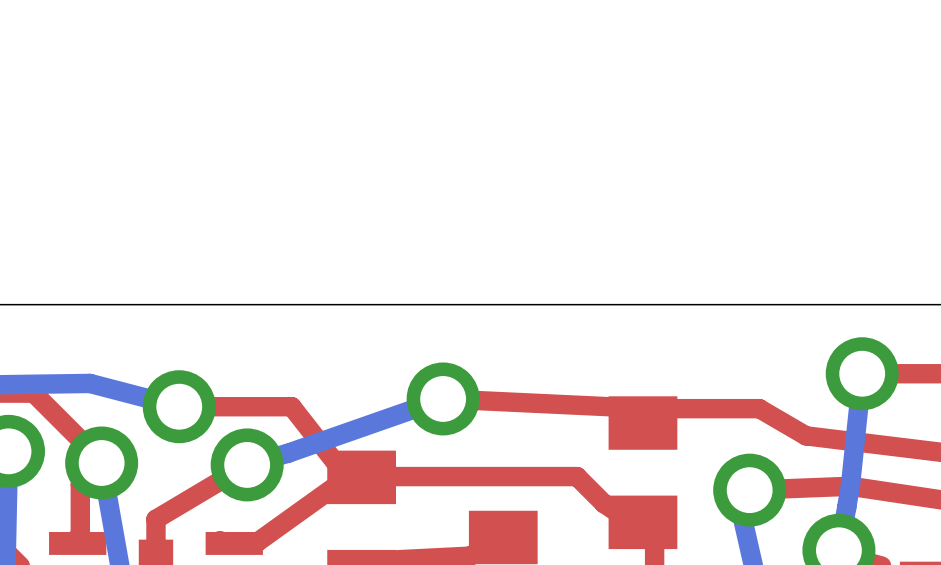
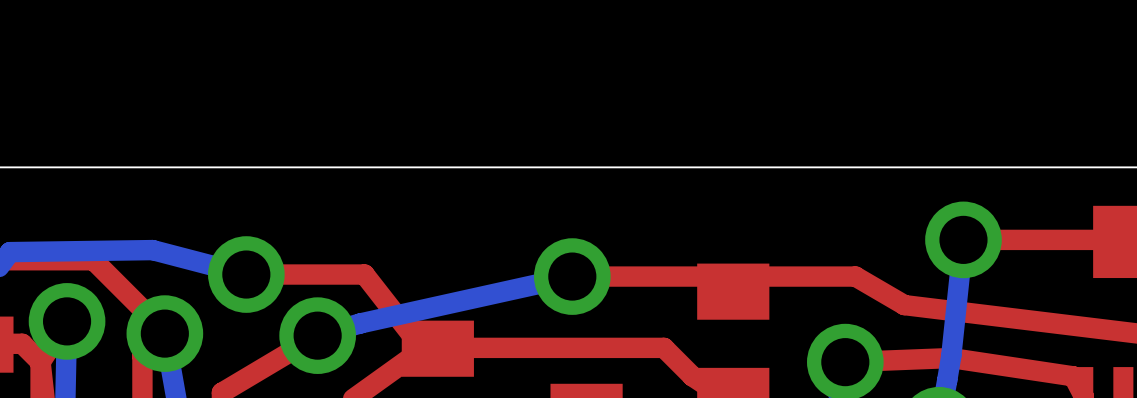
top track: (443, 398) (650, 408) -> (572, 276) (741, 276)
bottom track: (443, 398) (287, 453) -> (572, 276) (360, 323)
via position: (443, 398) -> (572, 276)

